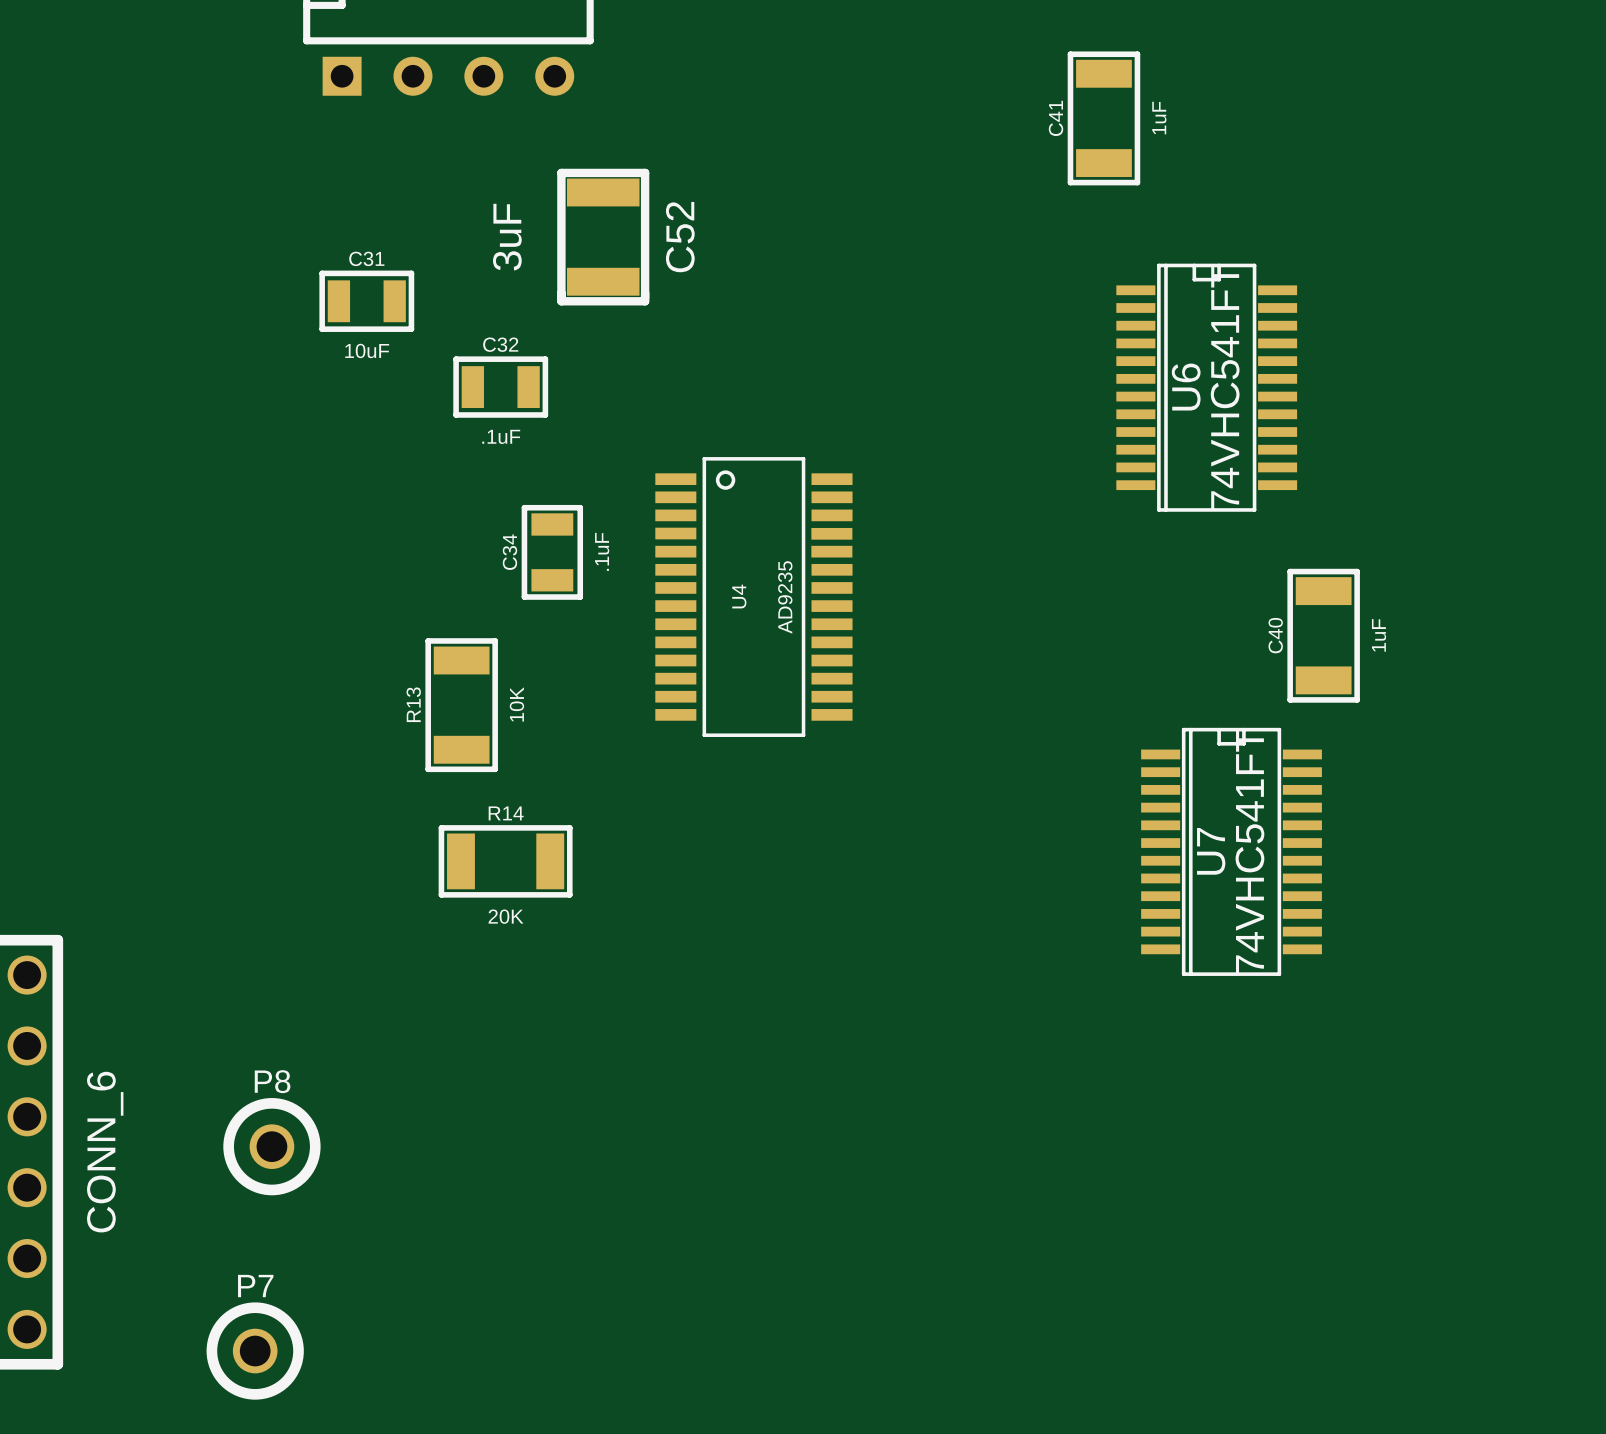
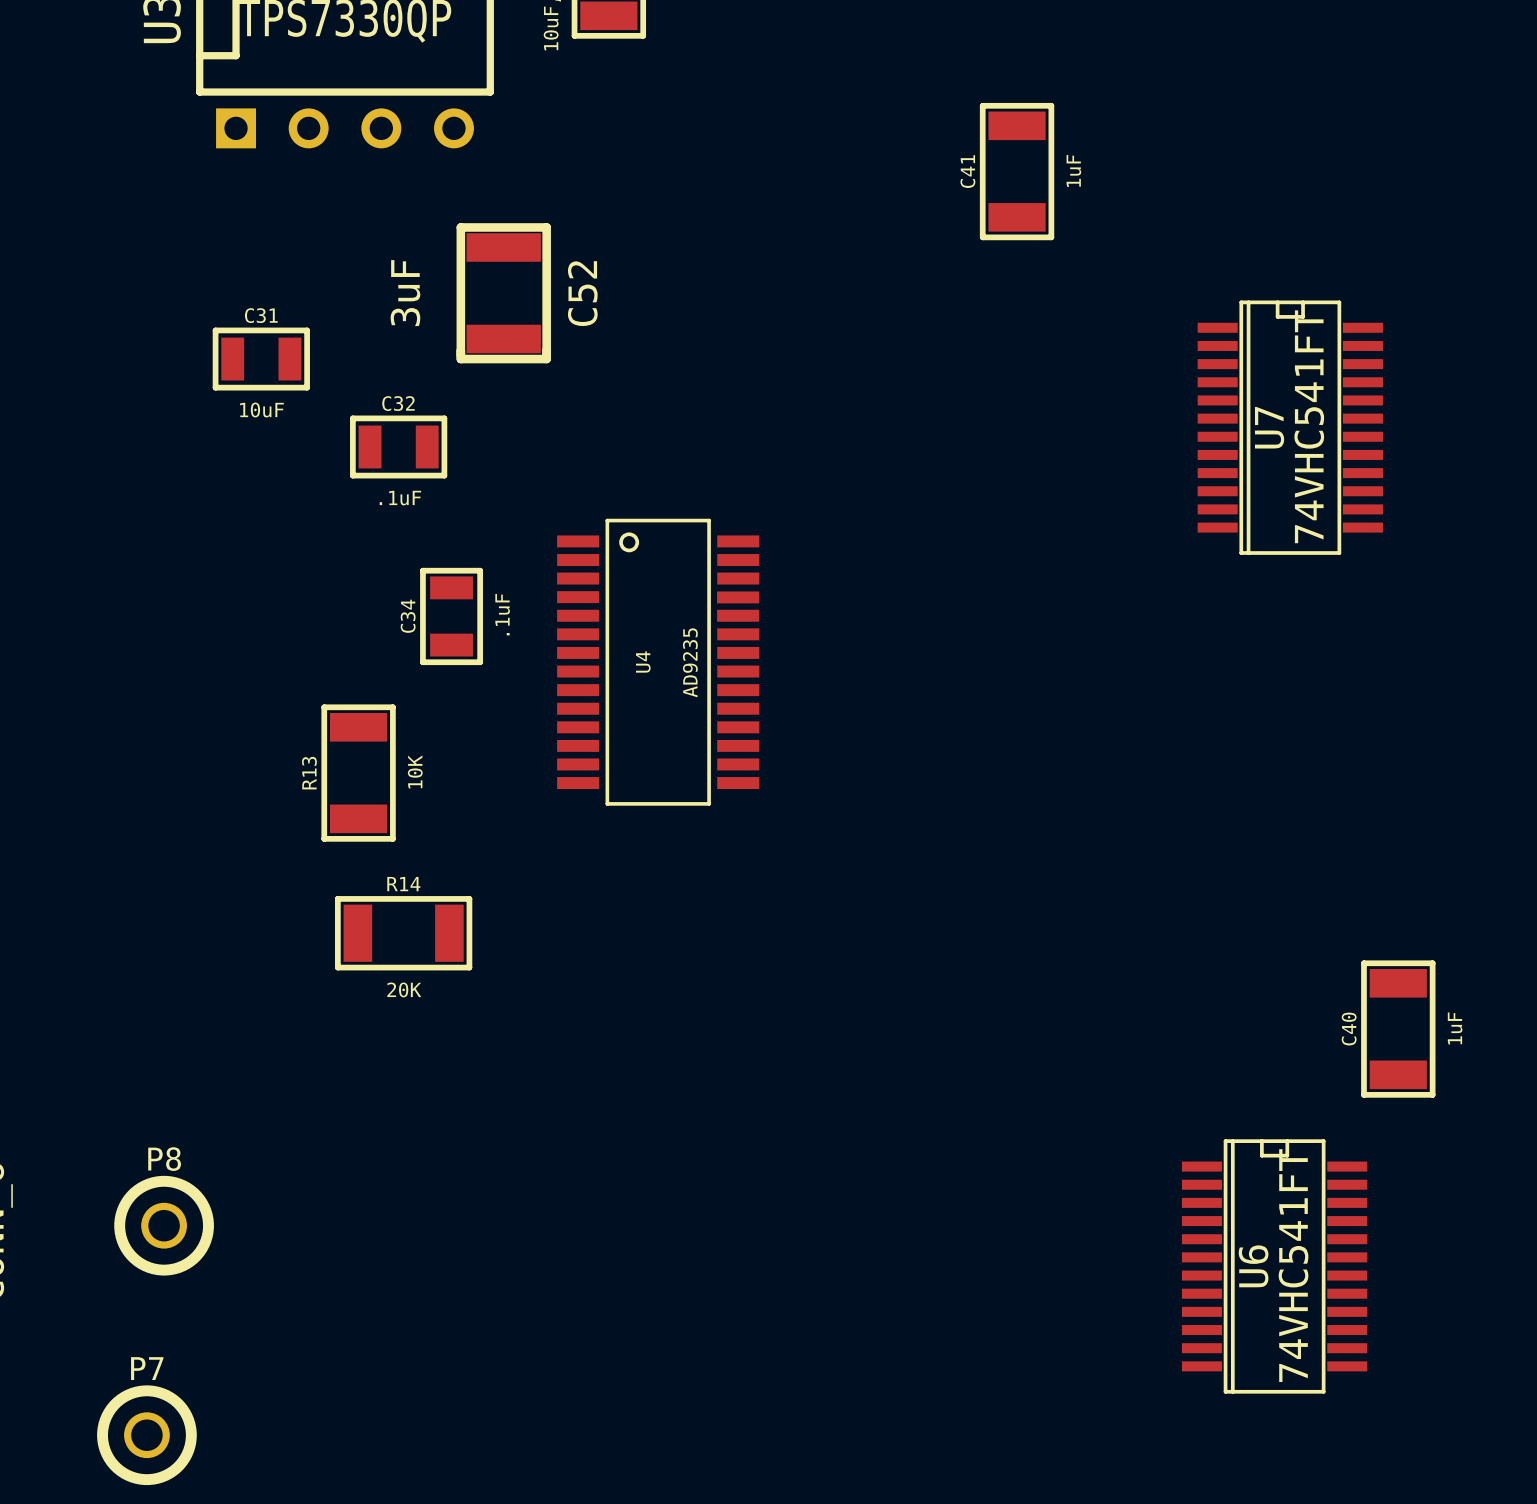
U6 position: (1206, 387) -> (1274, 1266)
C40 position: (1323, 635) -> (1398, 1029)
U7 position: (1231, 851) -> (1290, 427)

